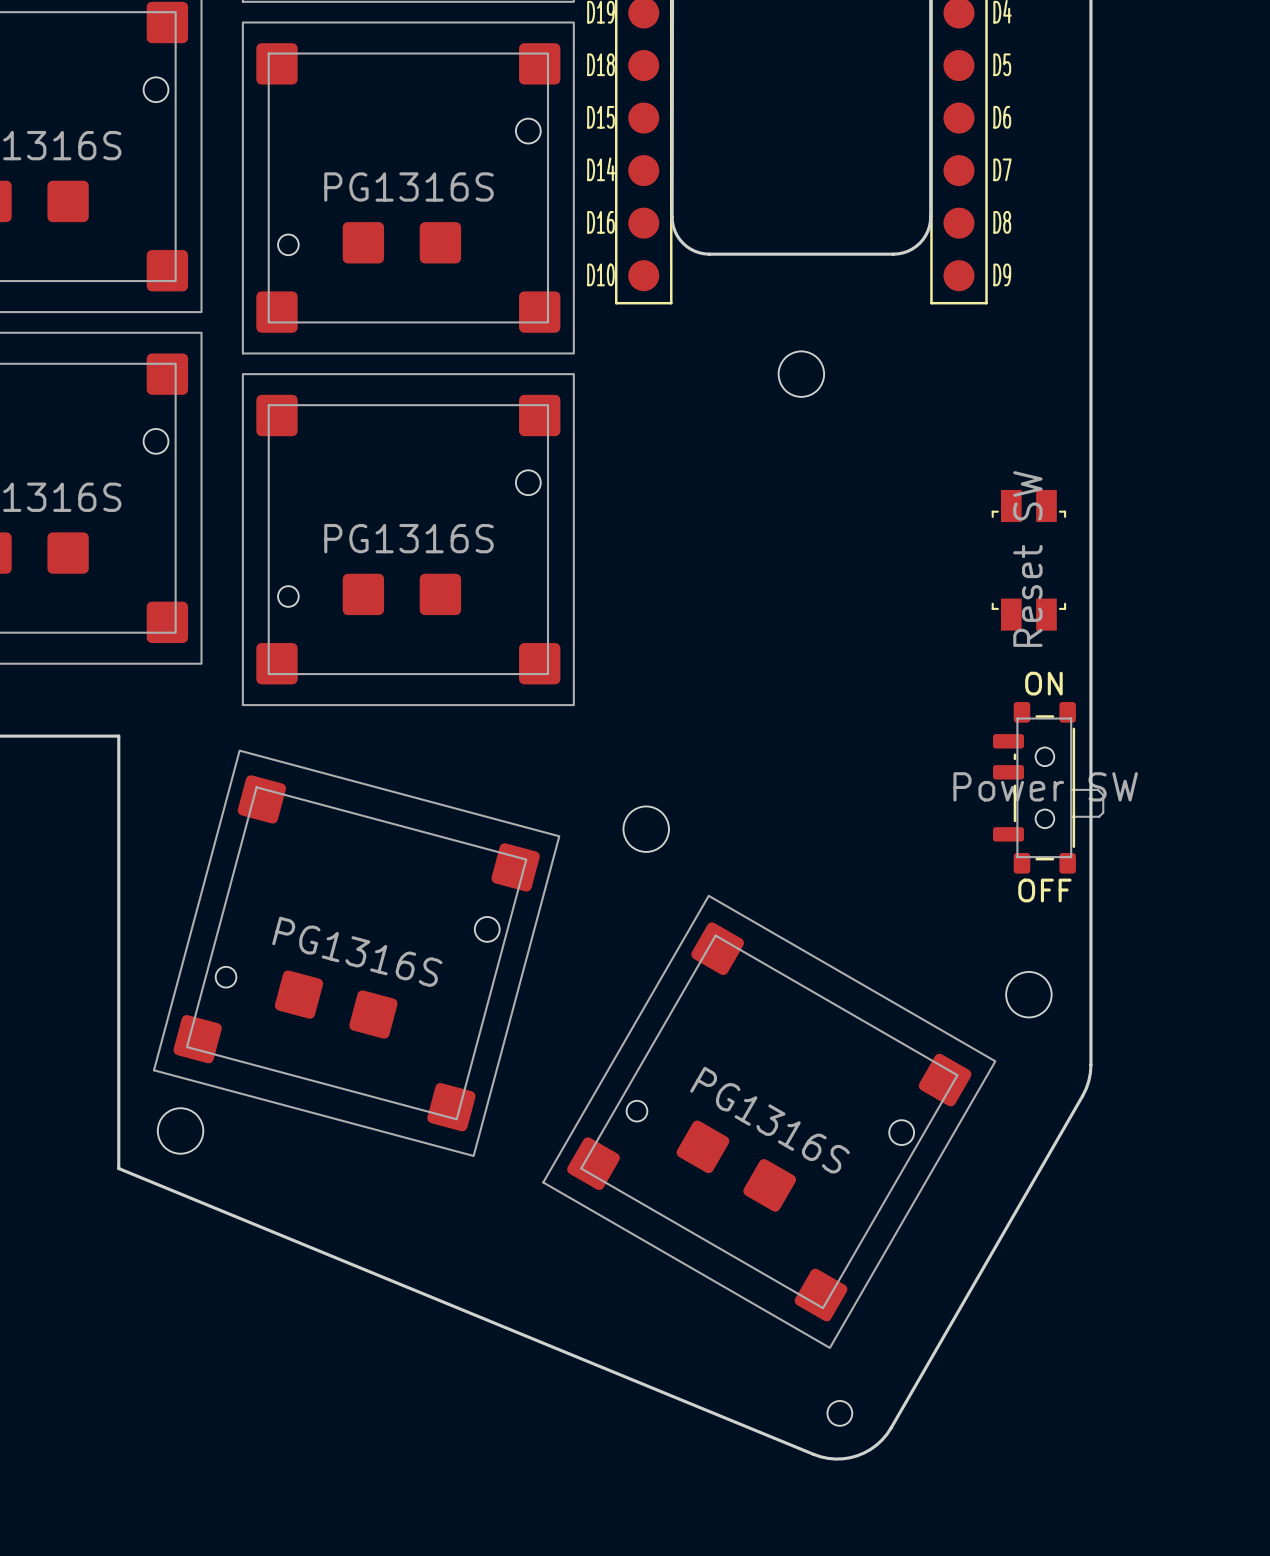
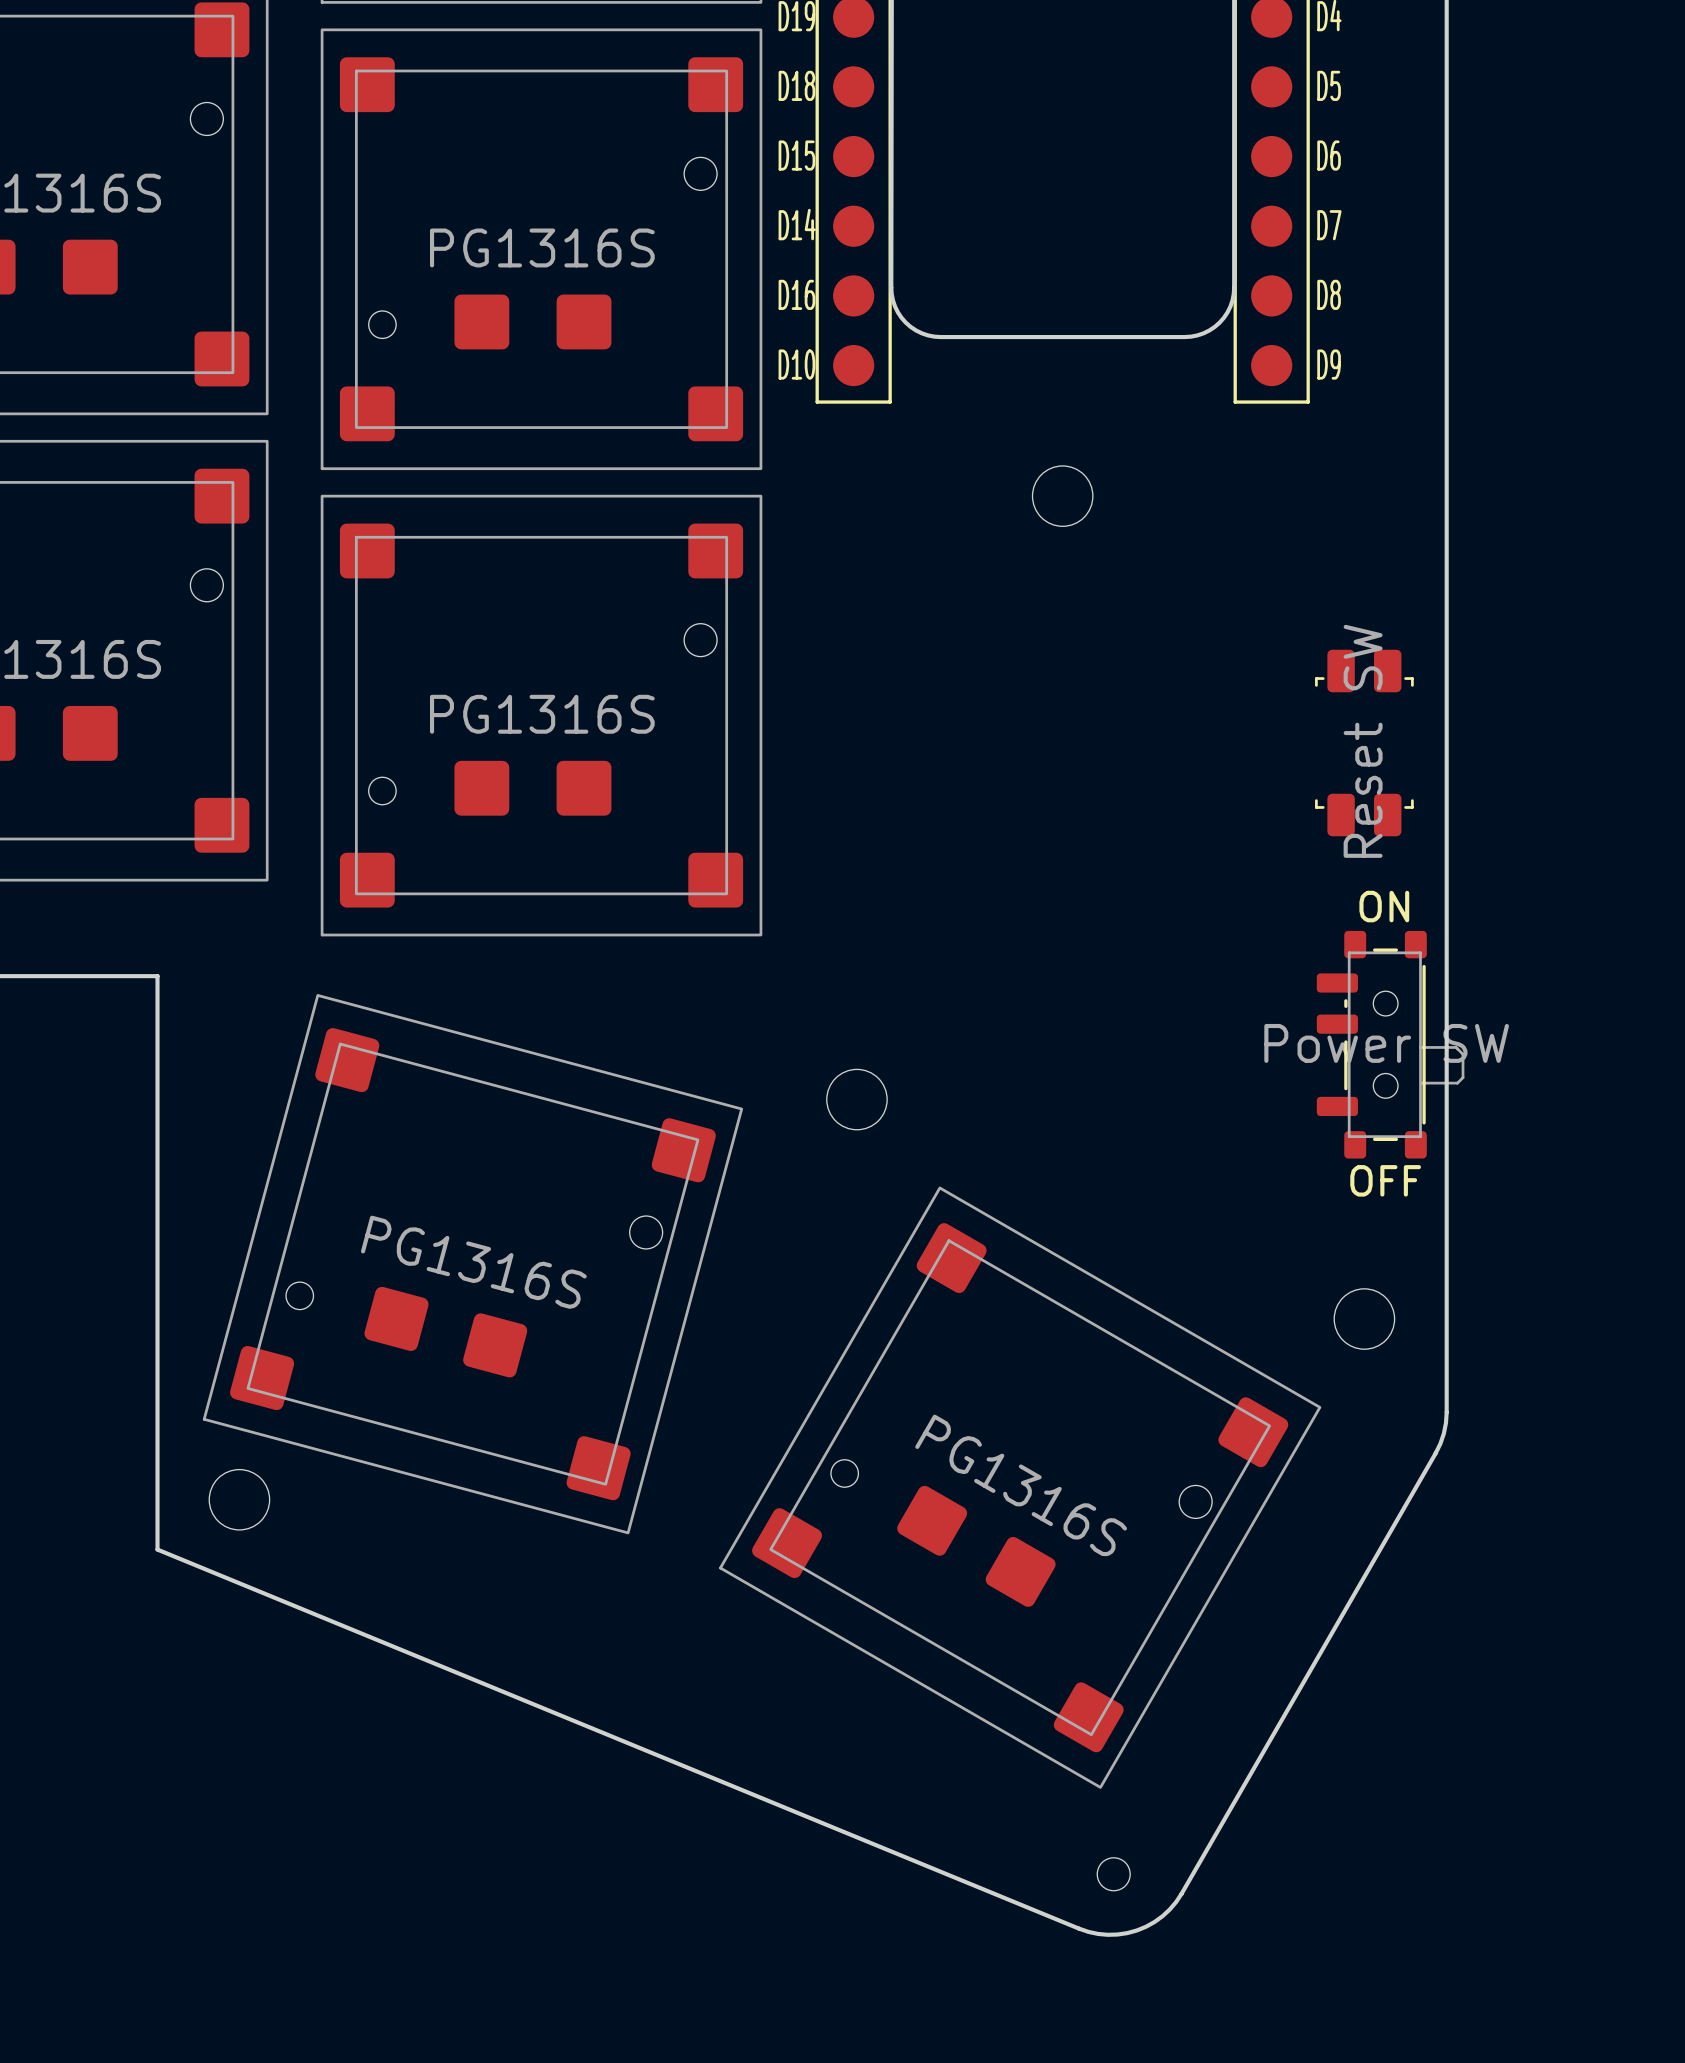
part footprint: [991, 489, 1067, 631] -> [1315, 649, 1414, 837]

